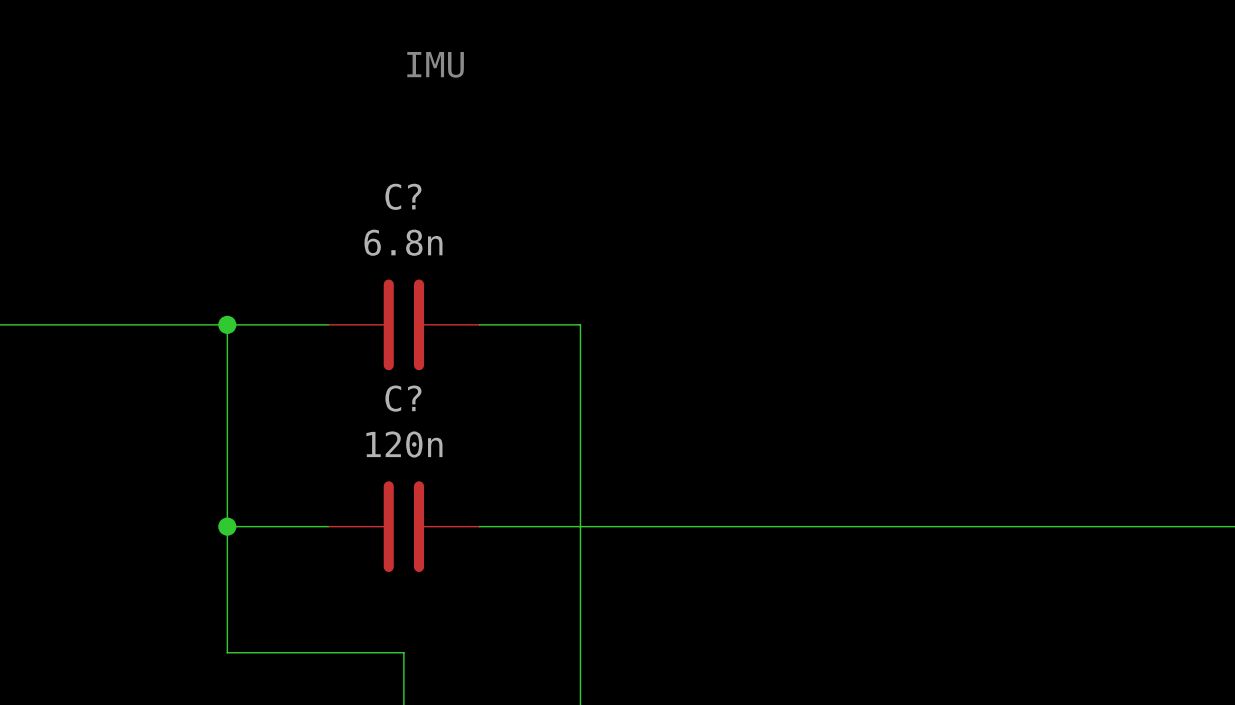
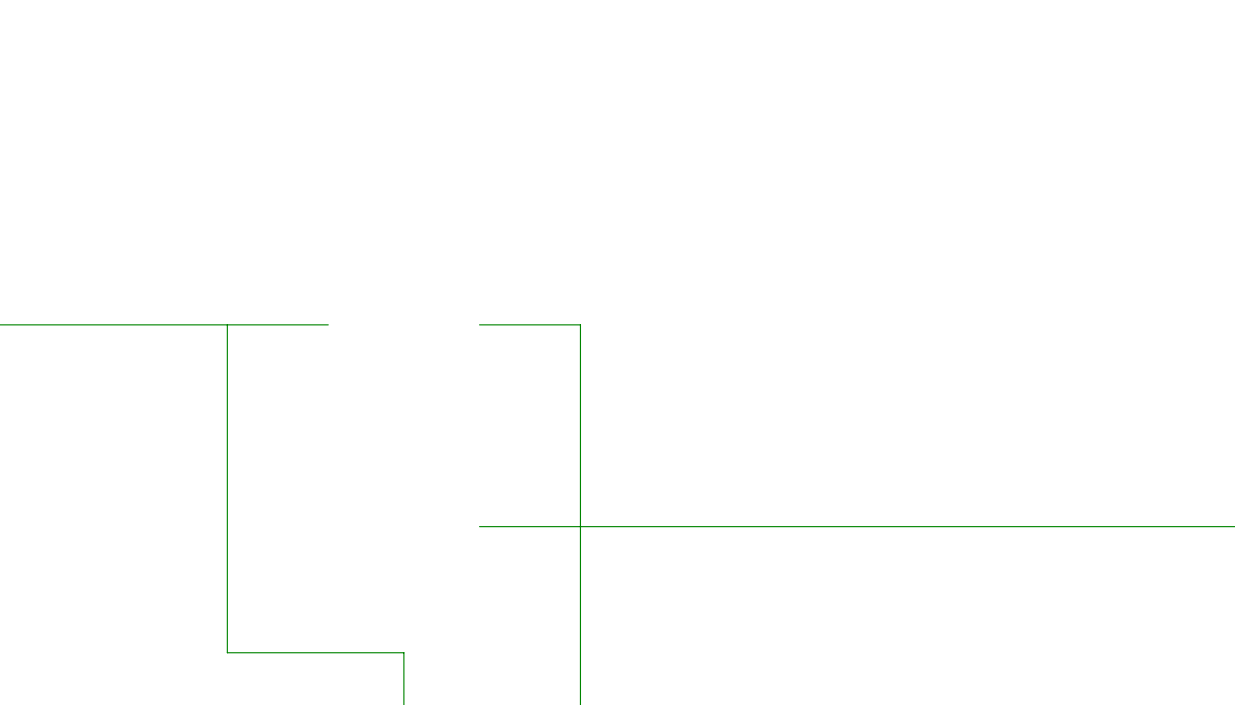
text: IMU (435, 64) -> none
junction: (227, 324) -> none
C?: 6.8n (403, 324) -> none
wire: (227, 526) (328, 526) -> none
junction: (227, 526) -> none
C?: 120n (403, 526) -> none

